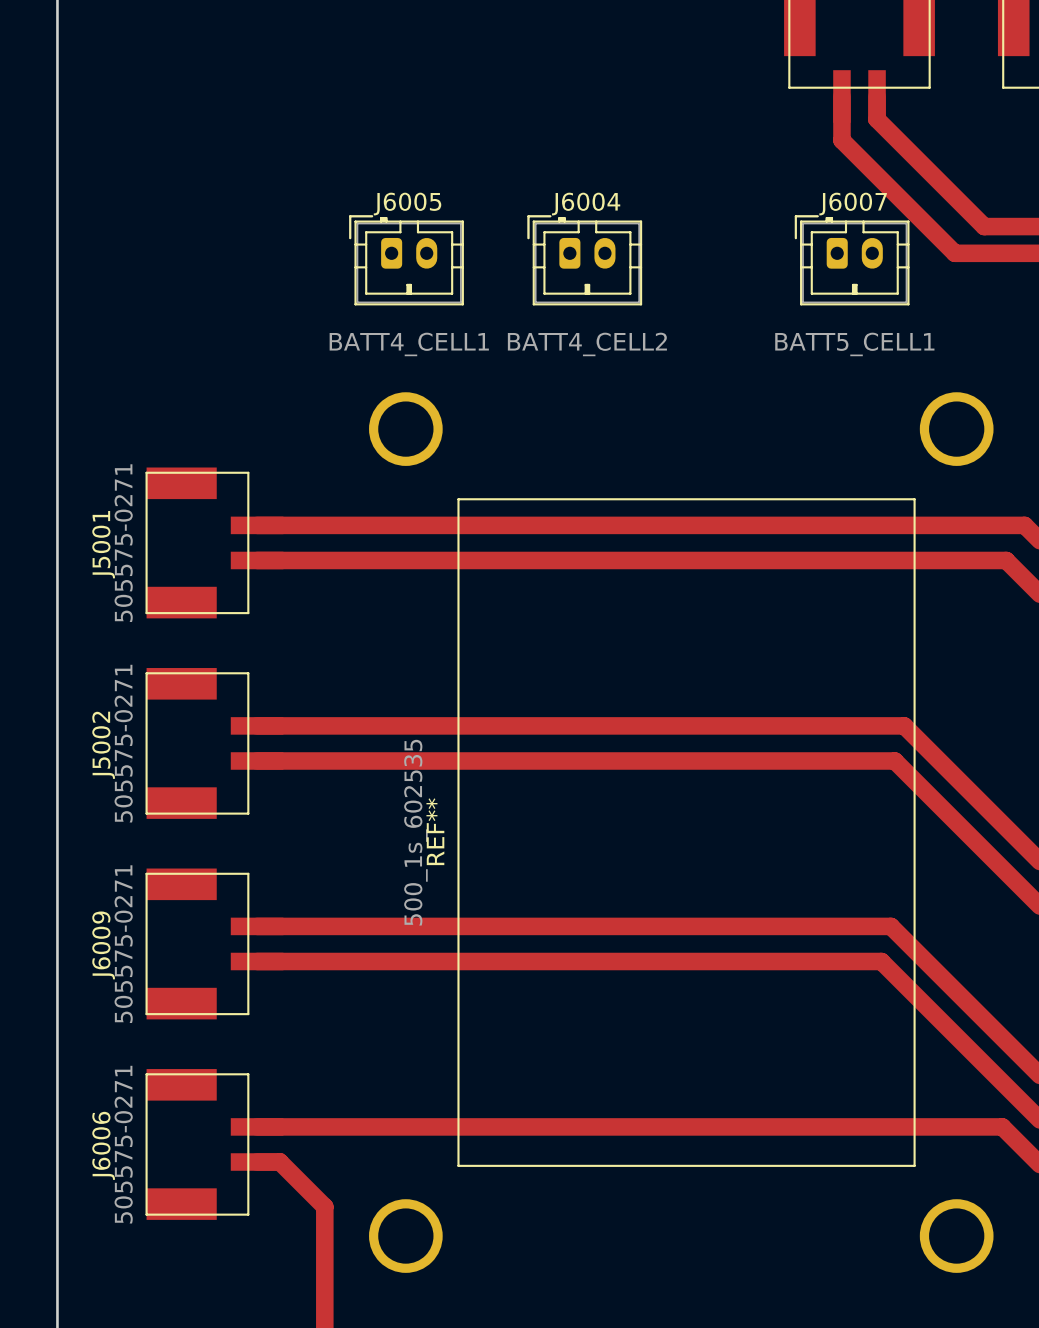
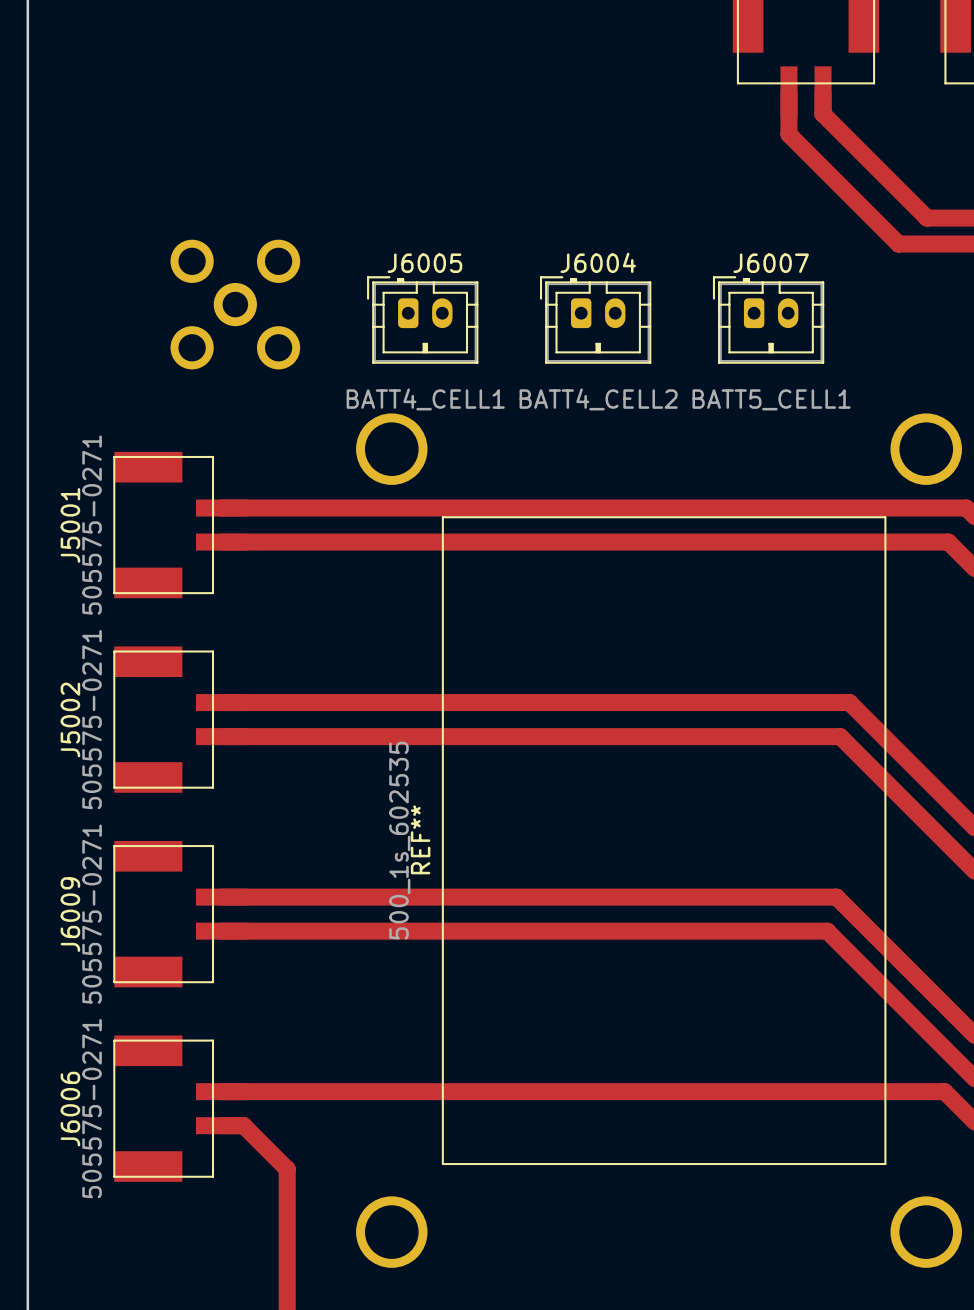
J6005 position: (406, 260) -> (422, 320)
J6004 position: (584, 260) -> (595, 320)
J6007 position: (852, 260) -> (768, 320)
part: none -> (235, 304)
REF** position: (681, 832) -> (659, 840)

